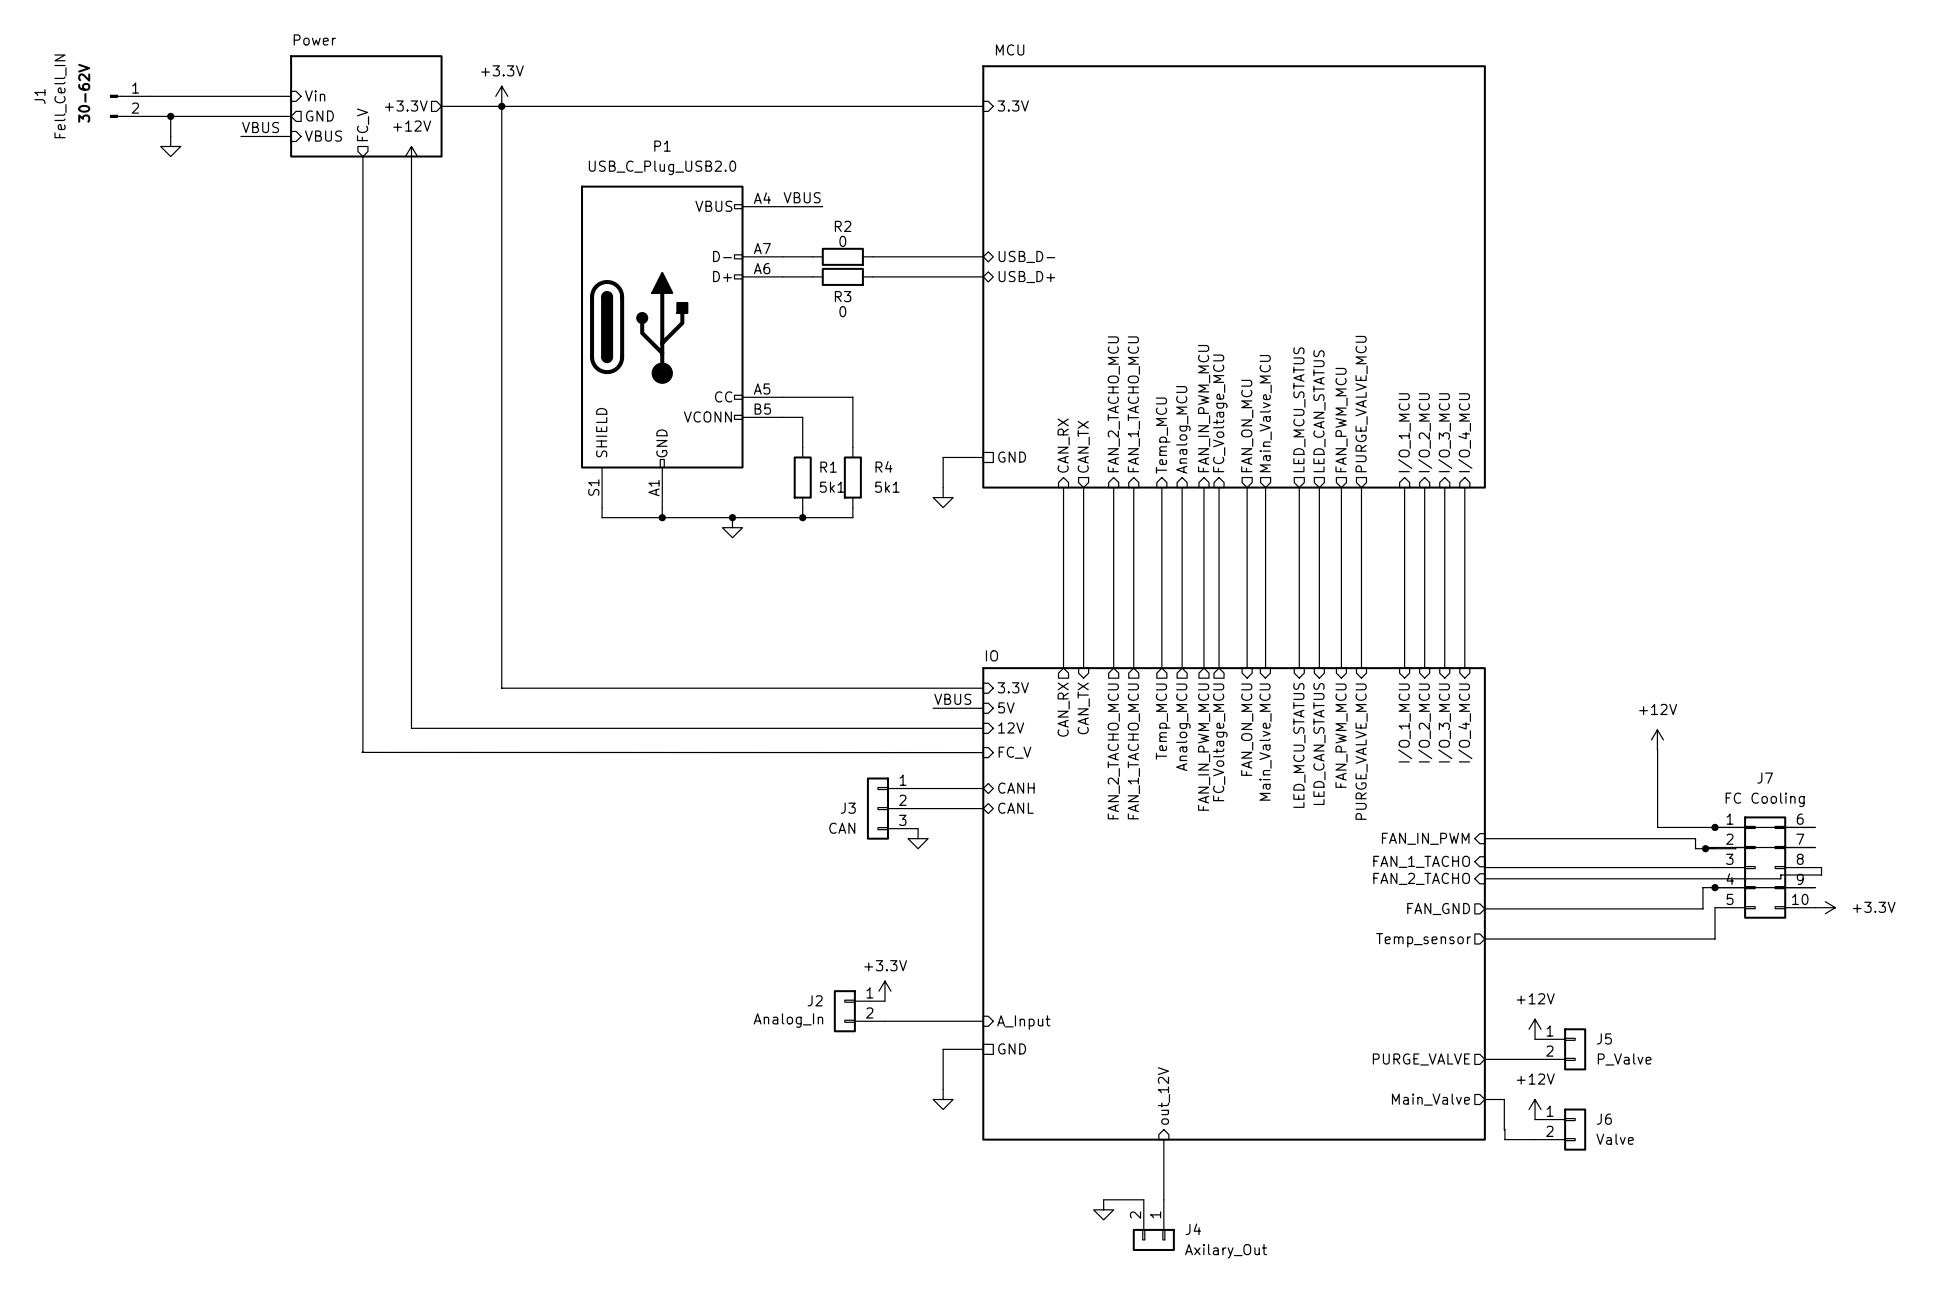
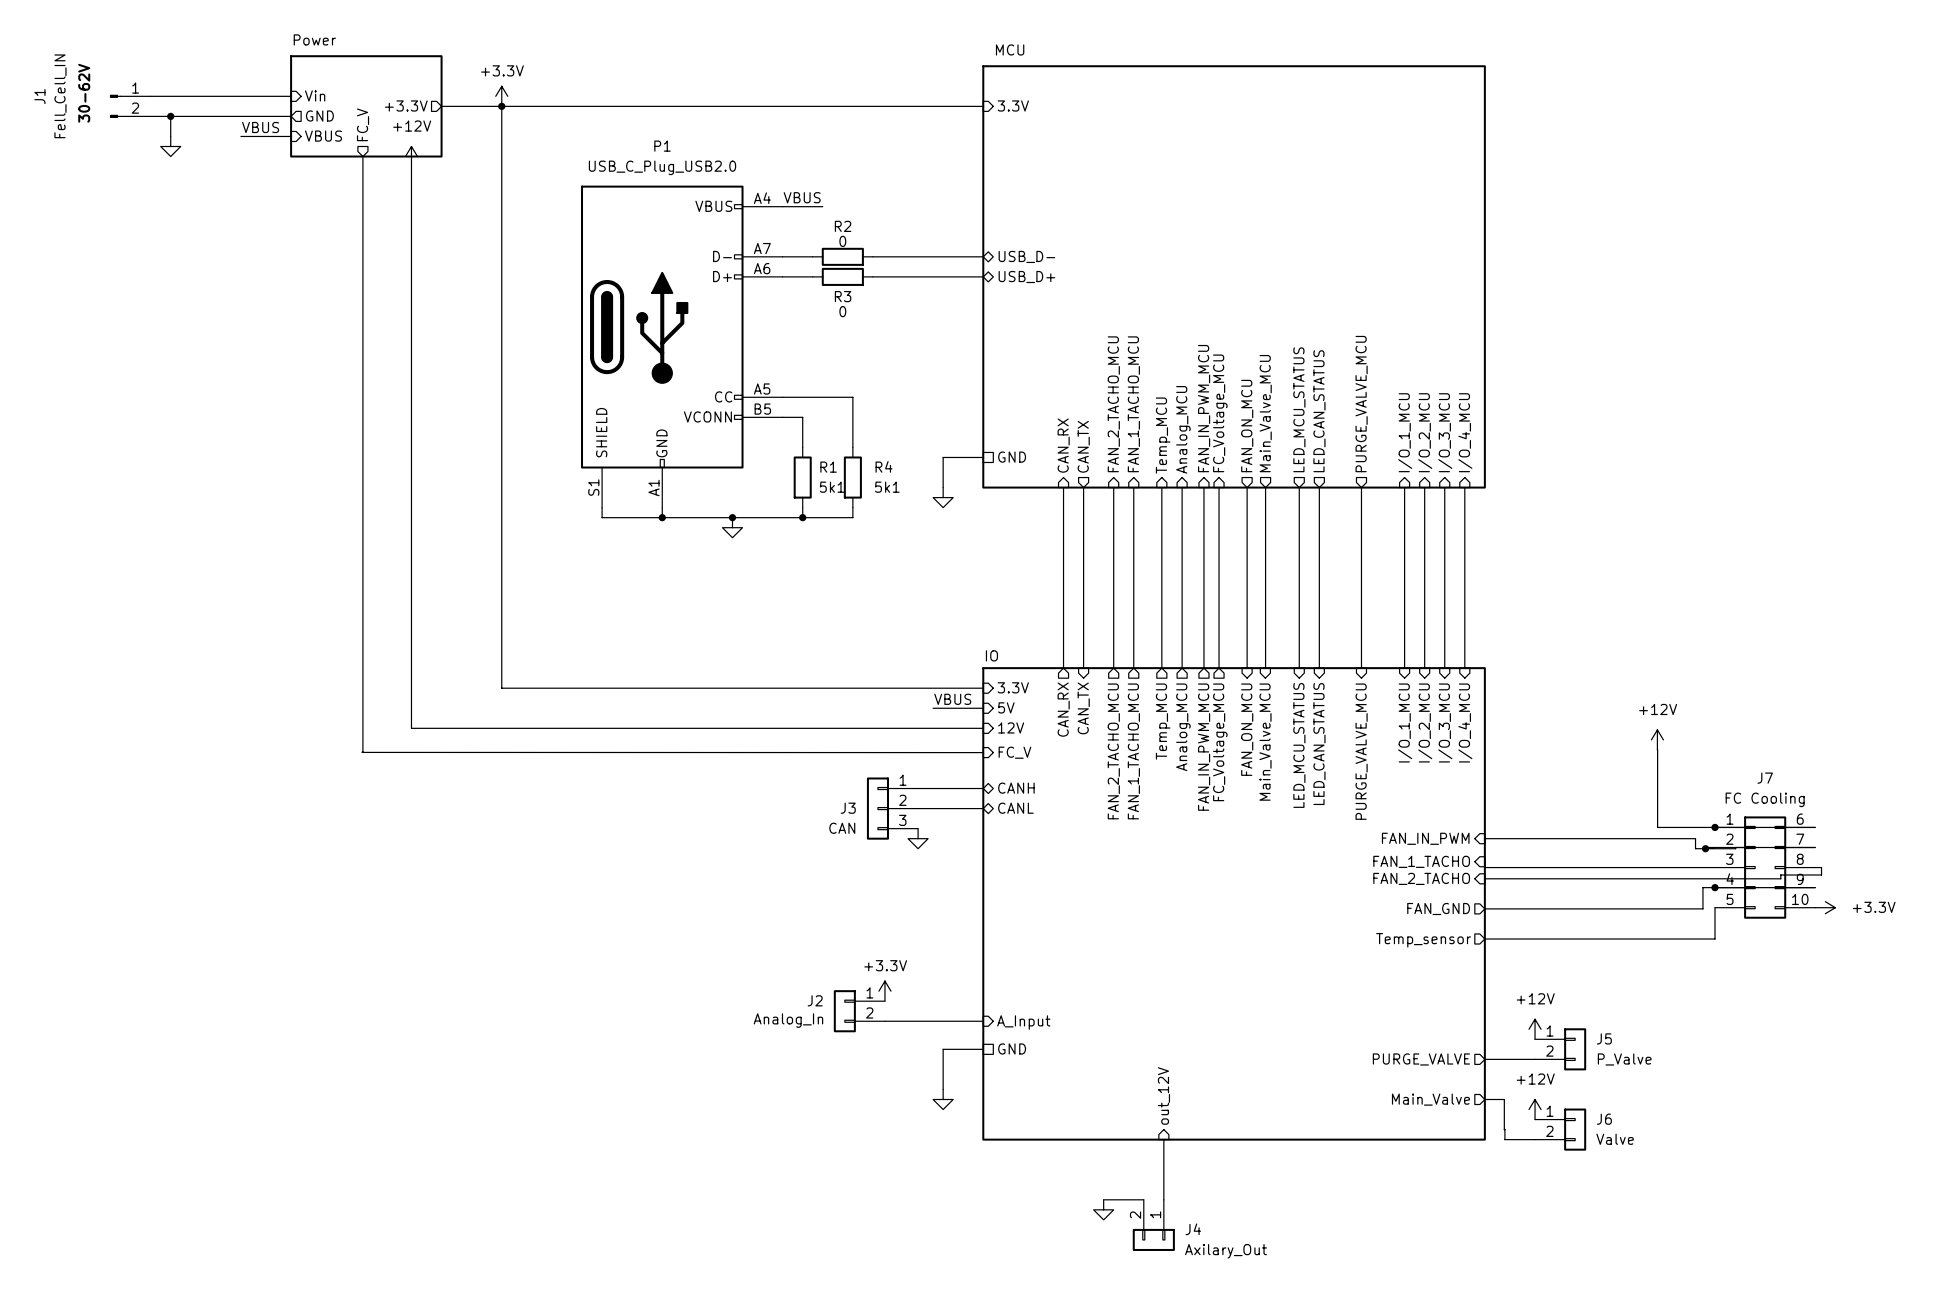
sheet pin: FAN_PWM_MCU (1341, 420) -> none
wire: (1341, 487) (1341, 668) -> none
sheet pin: FAN_PWM_MCU (1341, 735) -> none

